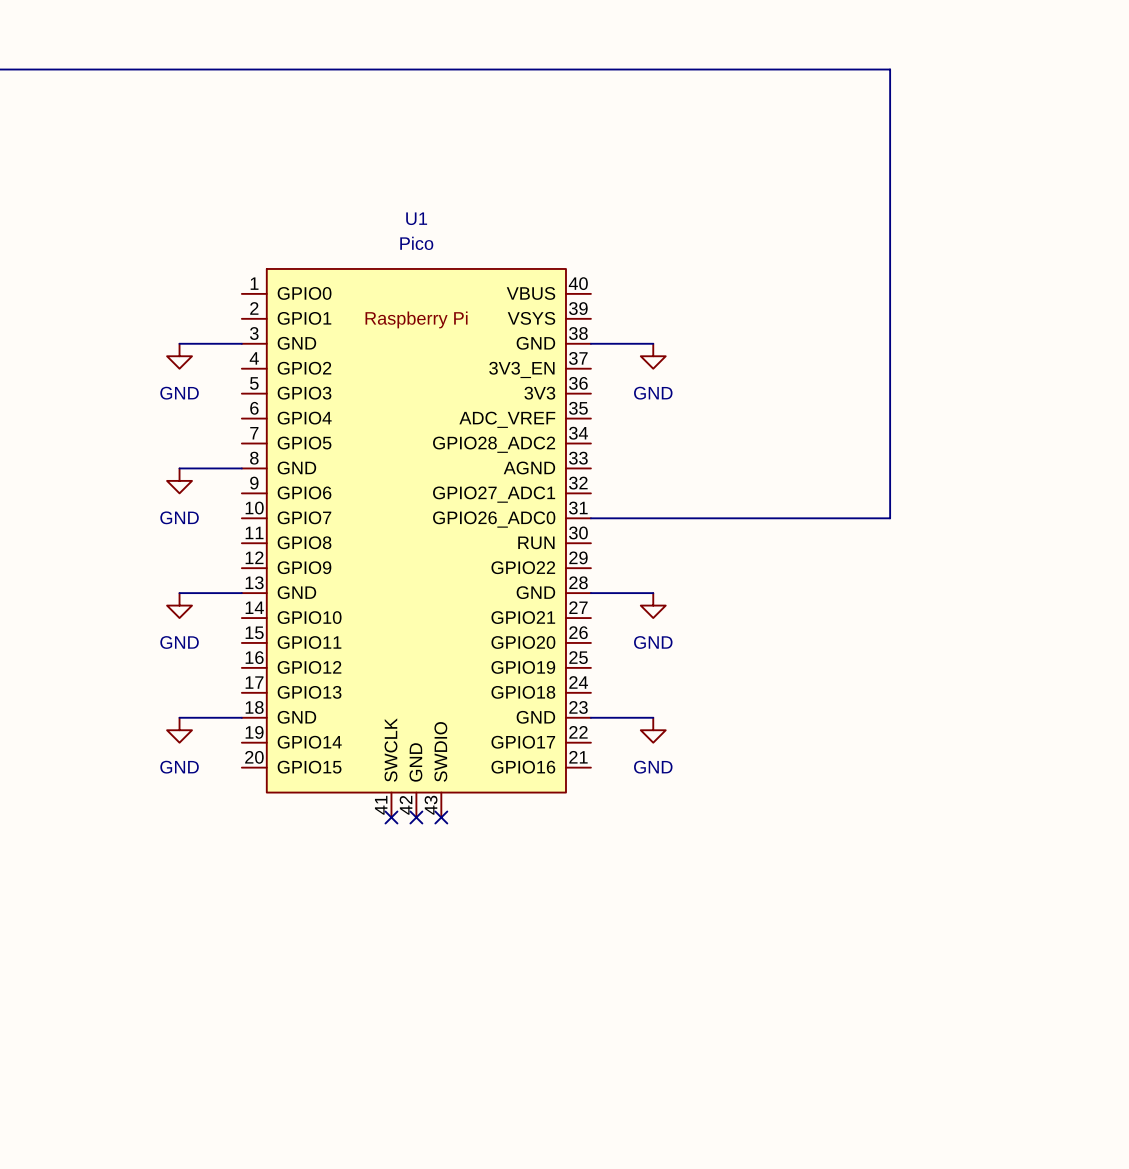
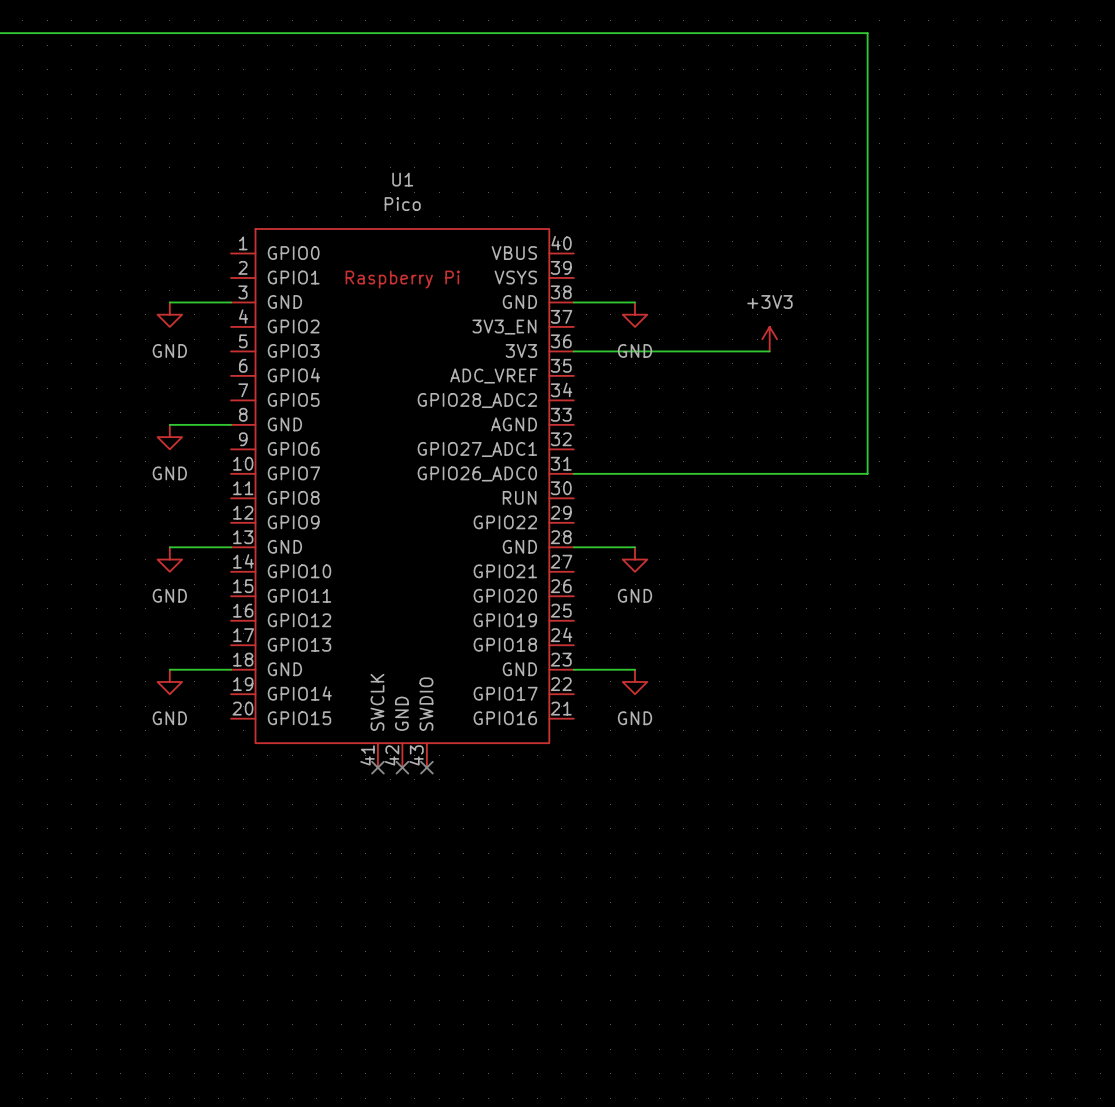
power symbol: none -> +3V3 (769, 339)
wire: none -> (573, 351) (769, 351)

